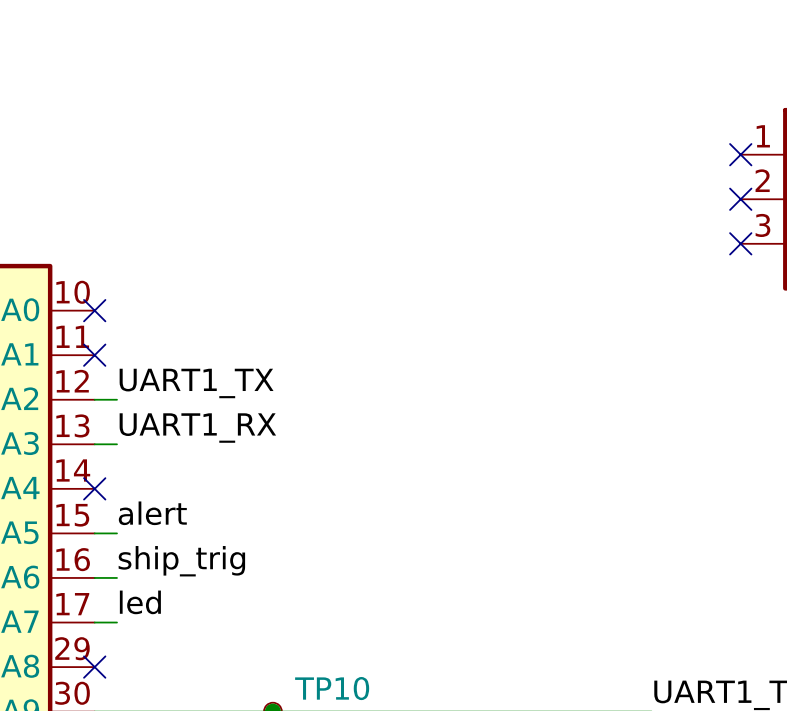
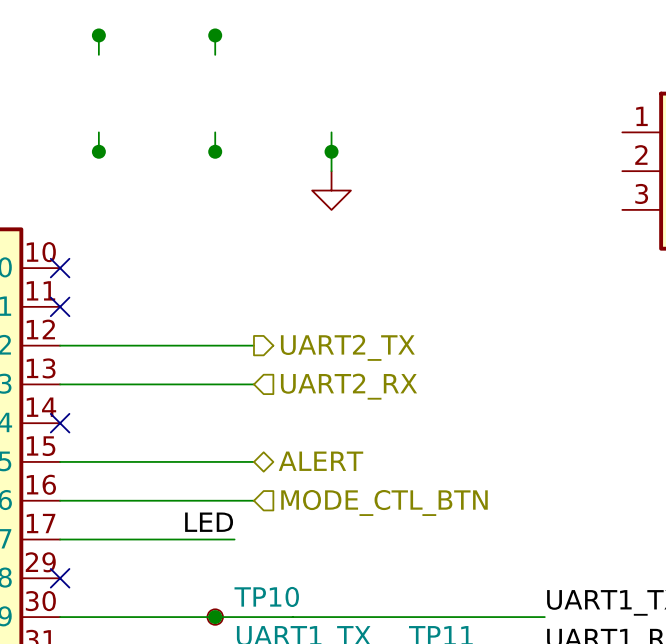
wire: none -> (98, 35) (98, 54)
junction: none -> (98, 35)
wire: none -> (215, 35) (215, 54)
junction: none -> (215, 35)
wire: none -> (98, 132) (98, 151)
wire: none -> (215, 132) (215, 151)
wire: none -> (331, 132) (331, 171)
no-connect mark: (740, 154) -> none
junction: none -> (98, 151)
junction: none -> (215, 151)
junction: none -> (331, 151)
no-connect mark: (740, 199) -> none
power symbol: none -> (331, 190)
no-connect mark: (740, 243) -> none
label: UART1_TX (196, 383) -> none
wire: none -> (79, 345) (253, 345)
hierarchical label: none -> UART2_TX (347, 347)
label: UART1_RX (197, 428) -> none
wire: none -> (79, 384) (253, 384)
hierarchical label: none -> UART2_RX (348, 386)
label: alert (152, 513) -> none
hierarchical label: none -> ALERT (321, 461)
wire: none -> (79, 461) (253, 461)
label: ship_trig (181, 561) -> none
wire: none -> (79, 500) (253, 500)
hierarchical label: none -> MODE_CTL_BTN (384, 502)
label: led (140, 602) -> none
label: none -> LED (209, 522)
wire: none -> (79, 539) (234, 539)

